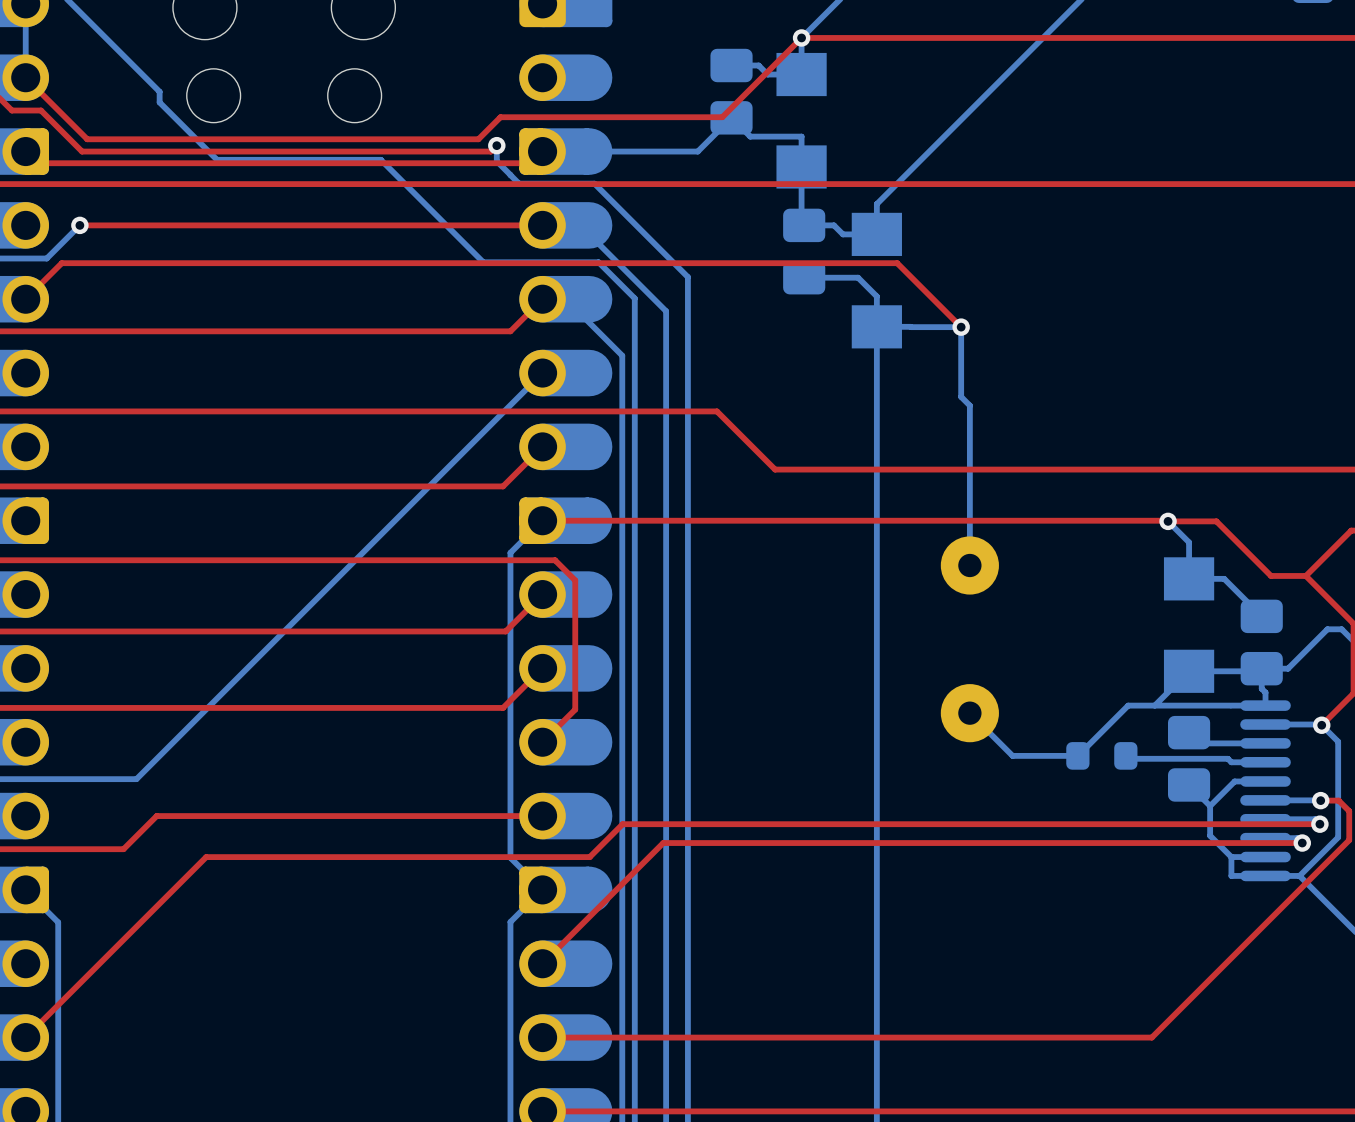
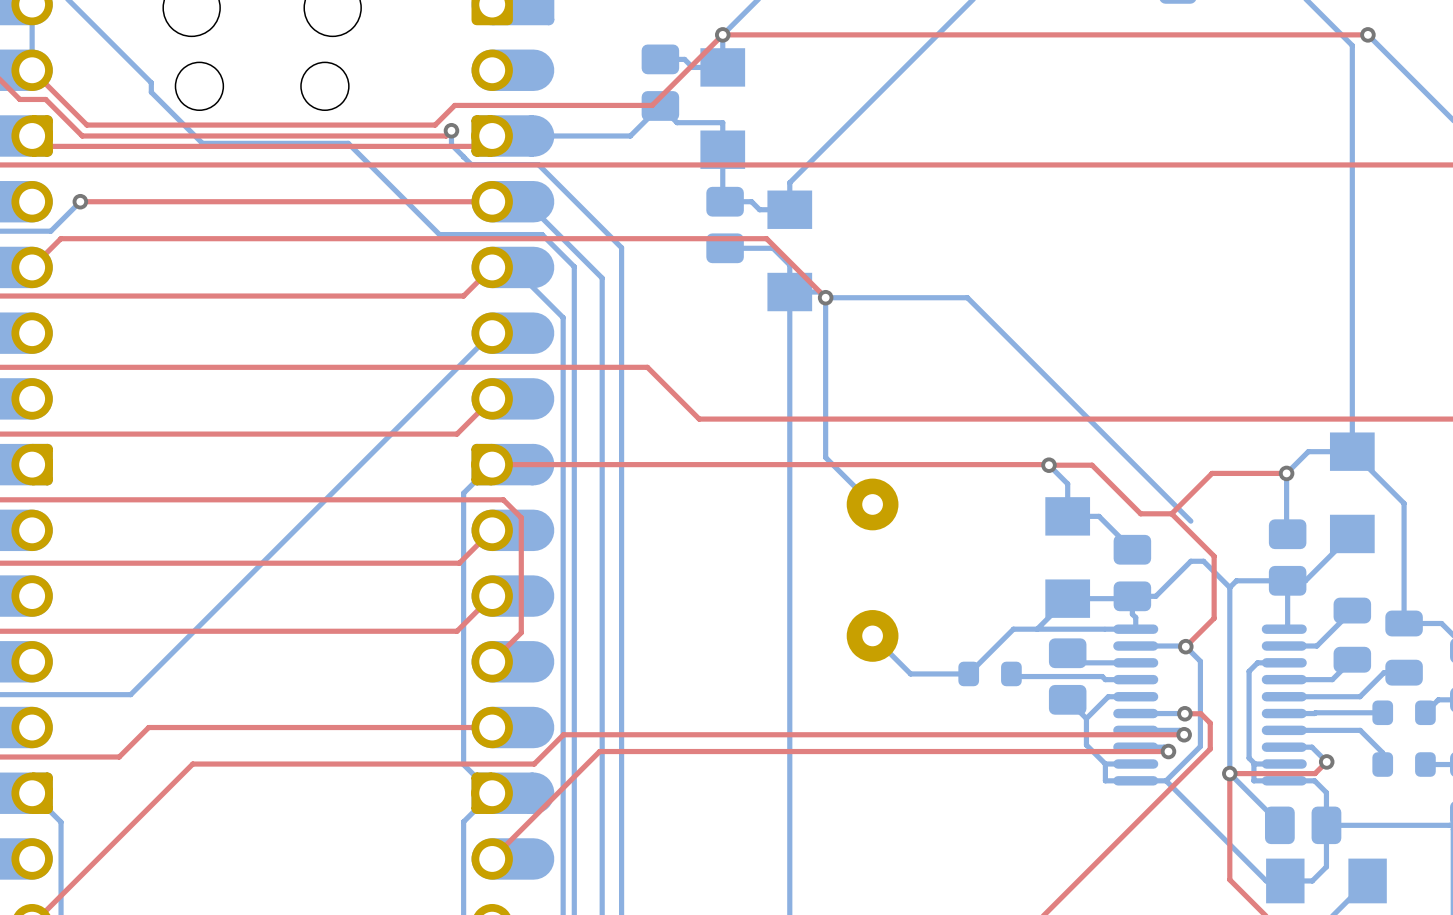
top track: (58, 266) (61, 263) (897, 263) (961, 327) -> (60, 238) (766, 238) (825, 297)
bottom track: (911, 327) (961, 327) (961, 396) (969, 405) (969, 565) -> (825, 297) (825, 457) (872, 504)
via position: (961, 327) -> (825, 297)
bottom track: none -> (825, 297) (967, 297) (1190, 521)

